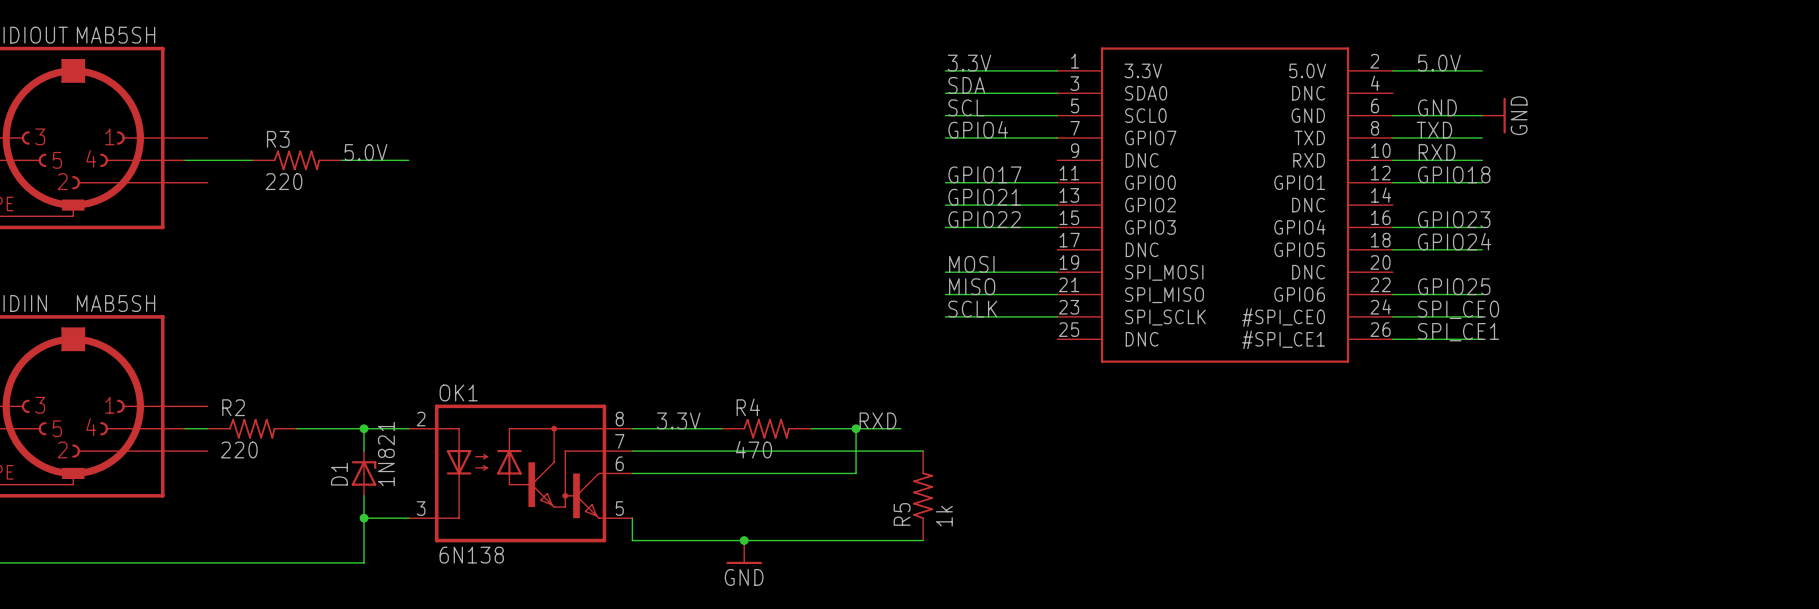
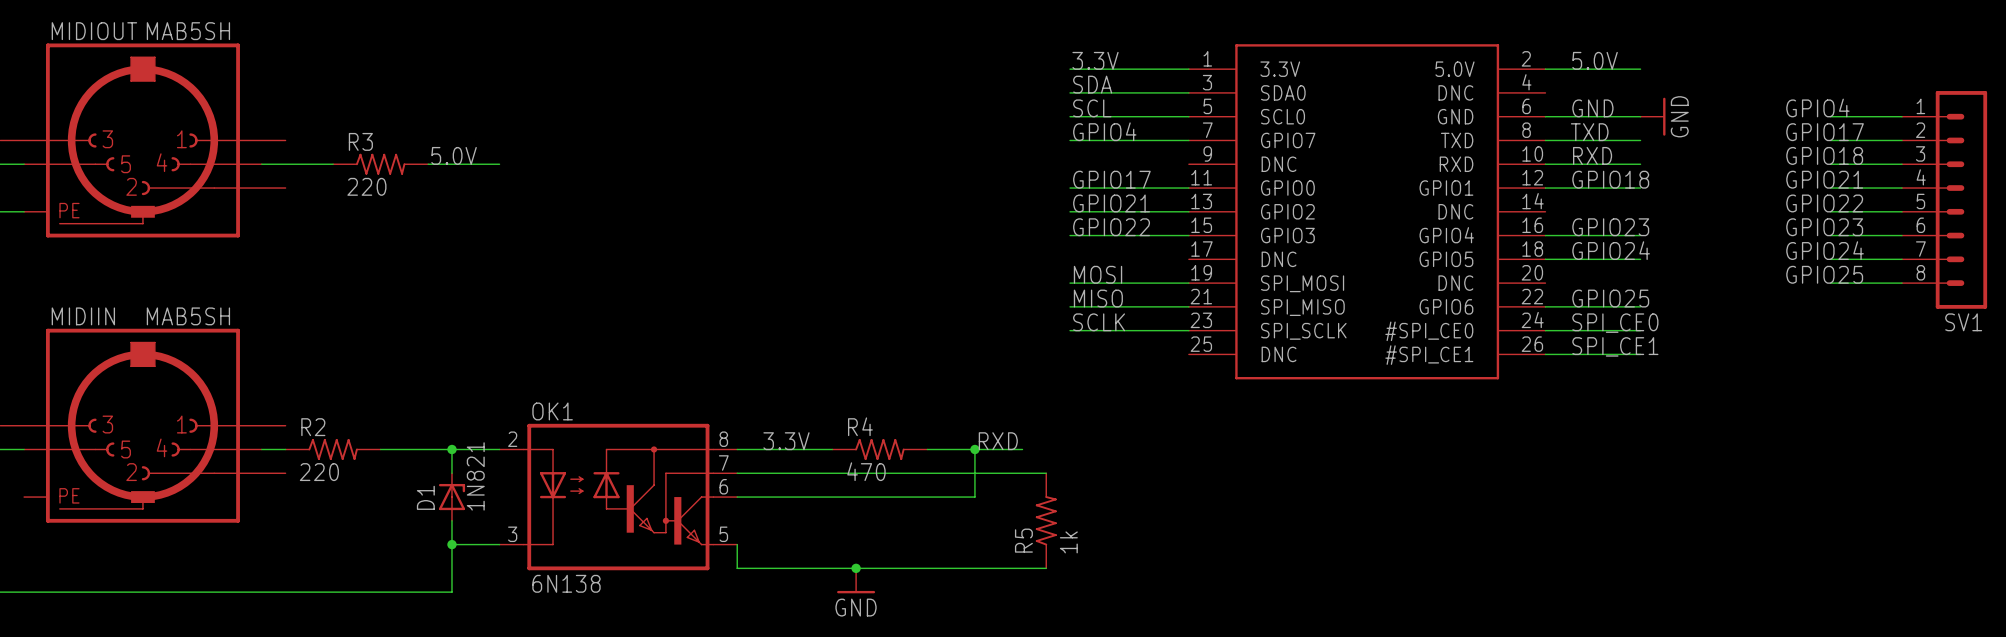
label: none -> GPIO4 (1817, 107)
wire: none -> (1830, 116) (1902, 116)
label: none -> GPIO17 (1825, 132)
wire: none -> (1830, 140) (1902, 140)
label: none -> GPIO18 (1824, 155)
wire: none -> (1830, 164) (1902, 164)
label: none -> GPIO21 (1824, 179)
wire: none -> (1830, 188) (1902, 188)
SV1: none -> (1944, 199)
label: none -> GPIO22 (1824, 203)
wire: none -> (1830, 211) (1902, 211)
label: none -> GPIO23 (1824, 227)
wire: none -> (1830, 235) (1902, 235)
label: none -> GPIO24 (1825, 250)
wire: none -> (1830, 259) (1902, 259)
label: none -> GPIO25 (1824, 274)
wire: none -> (1830, 283) (1902, 283)

